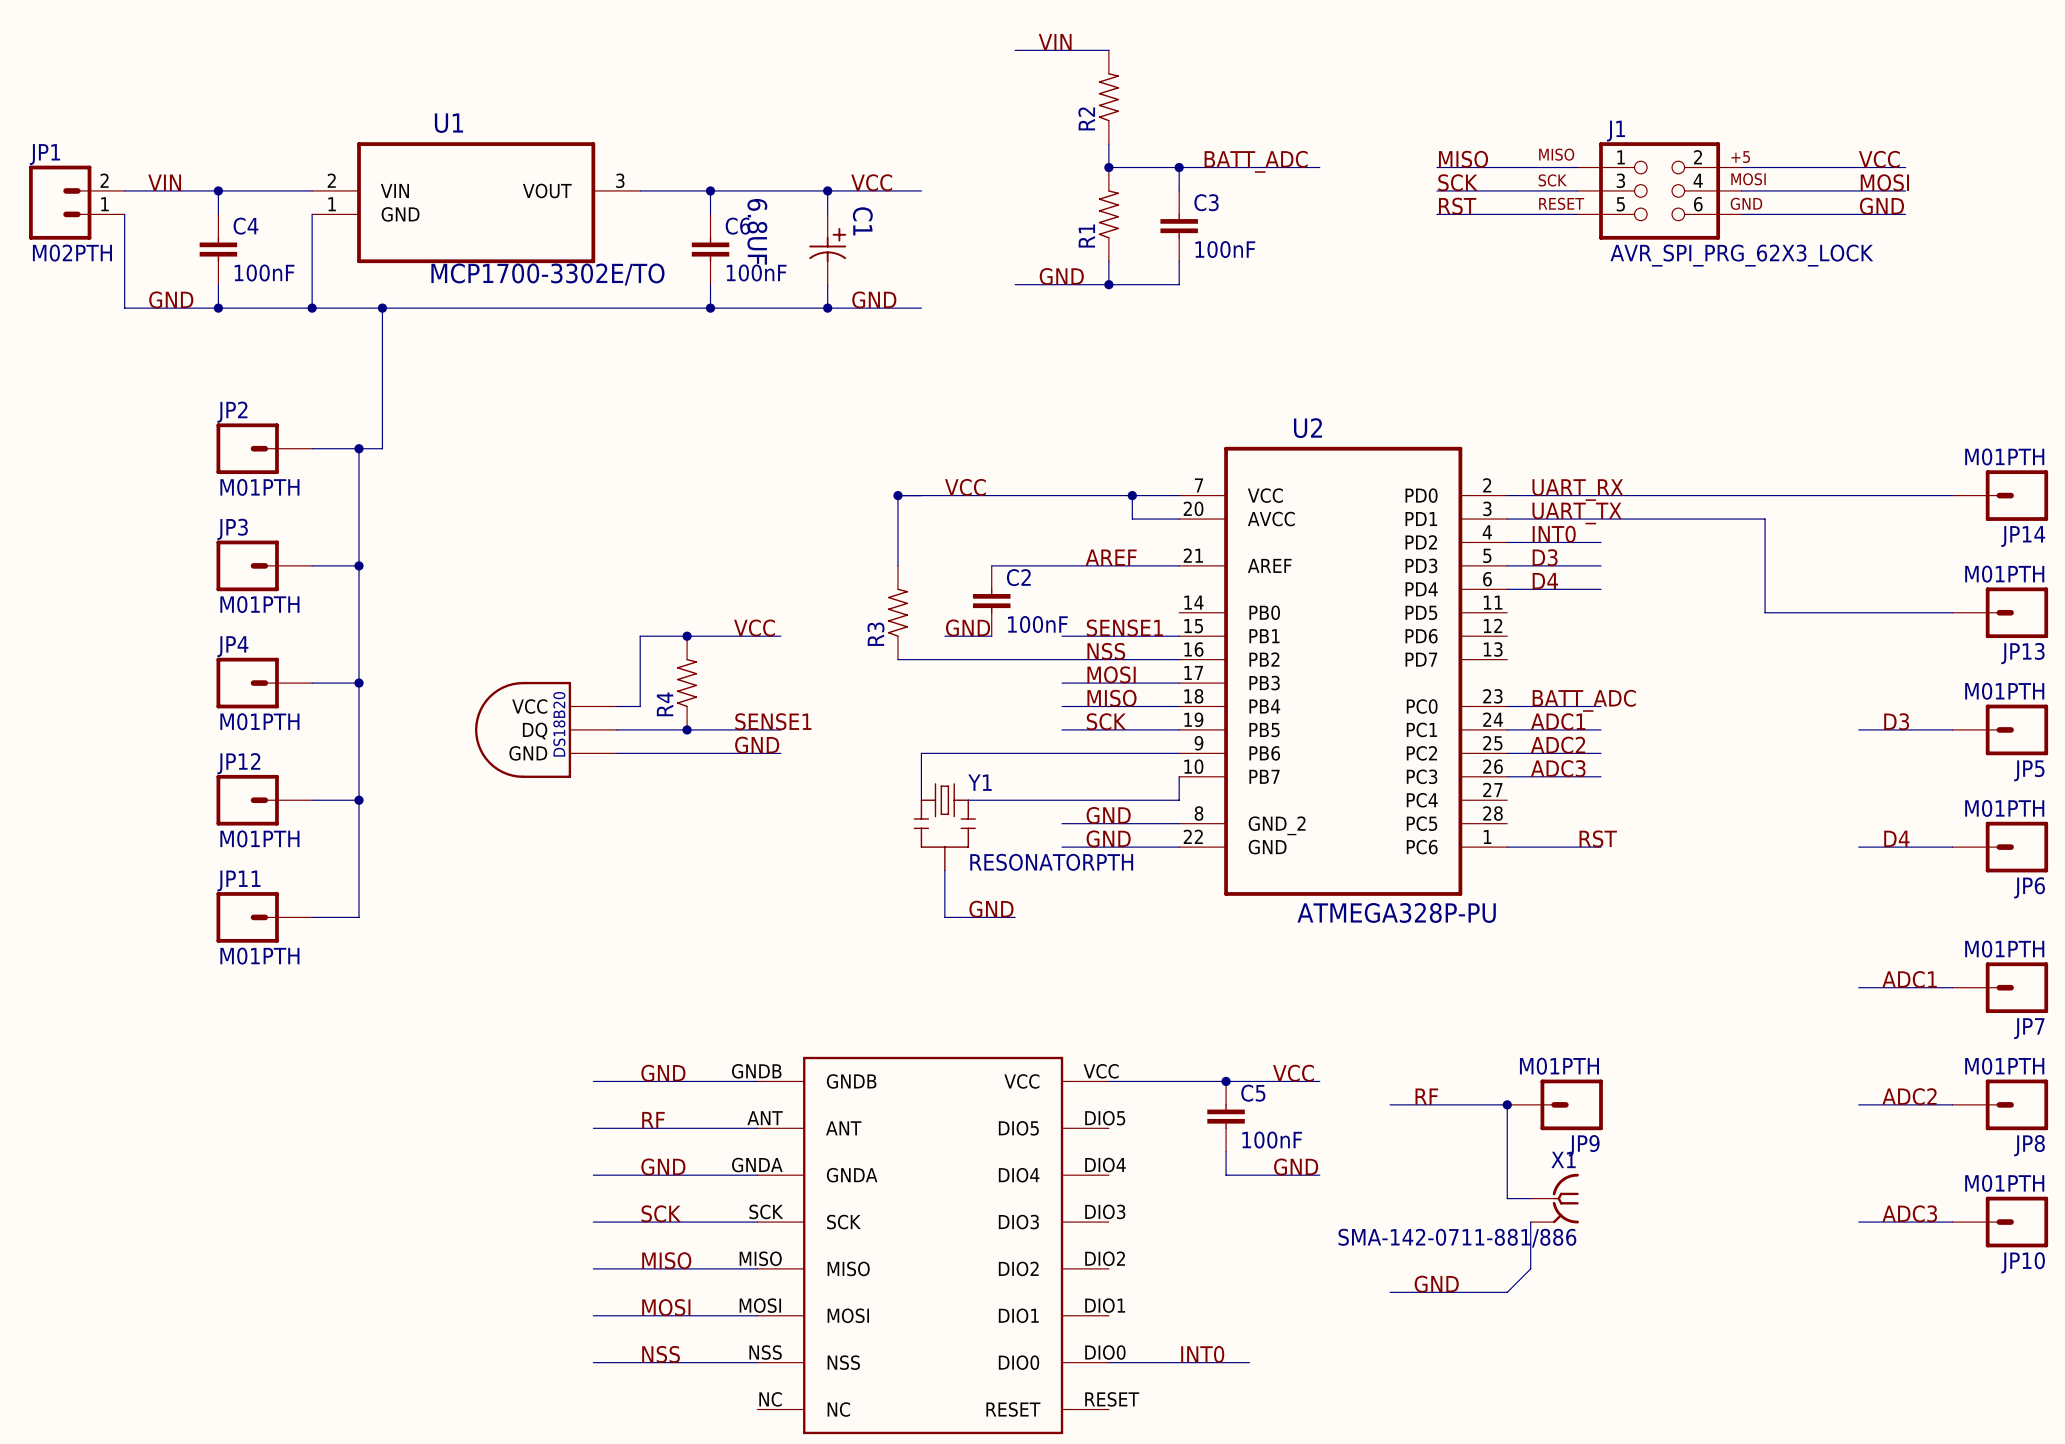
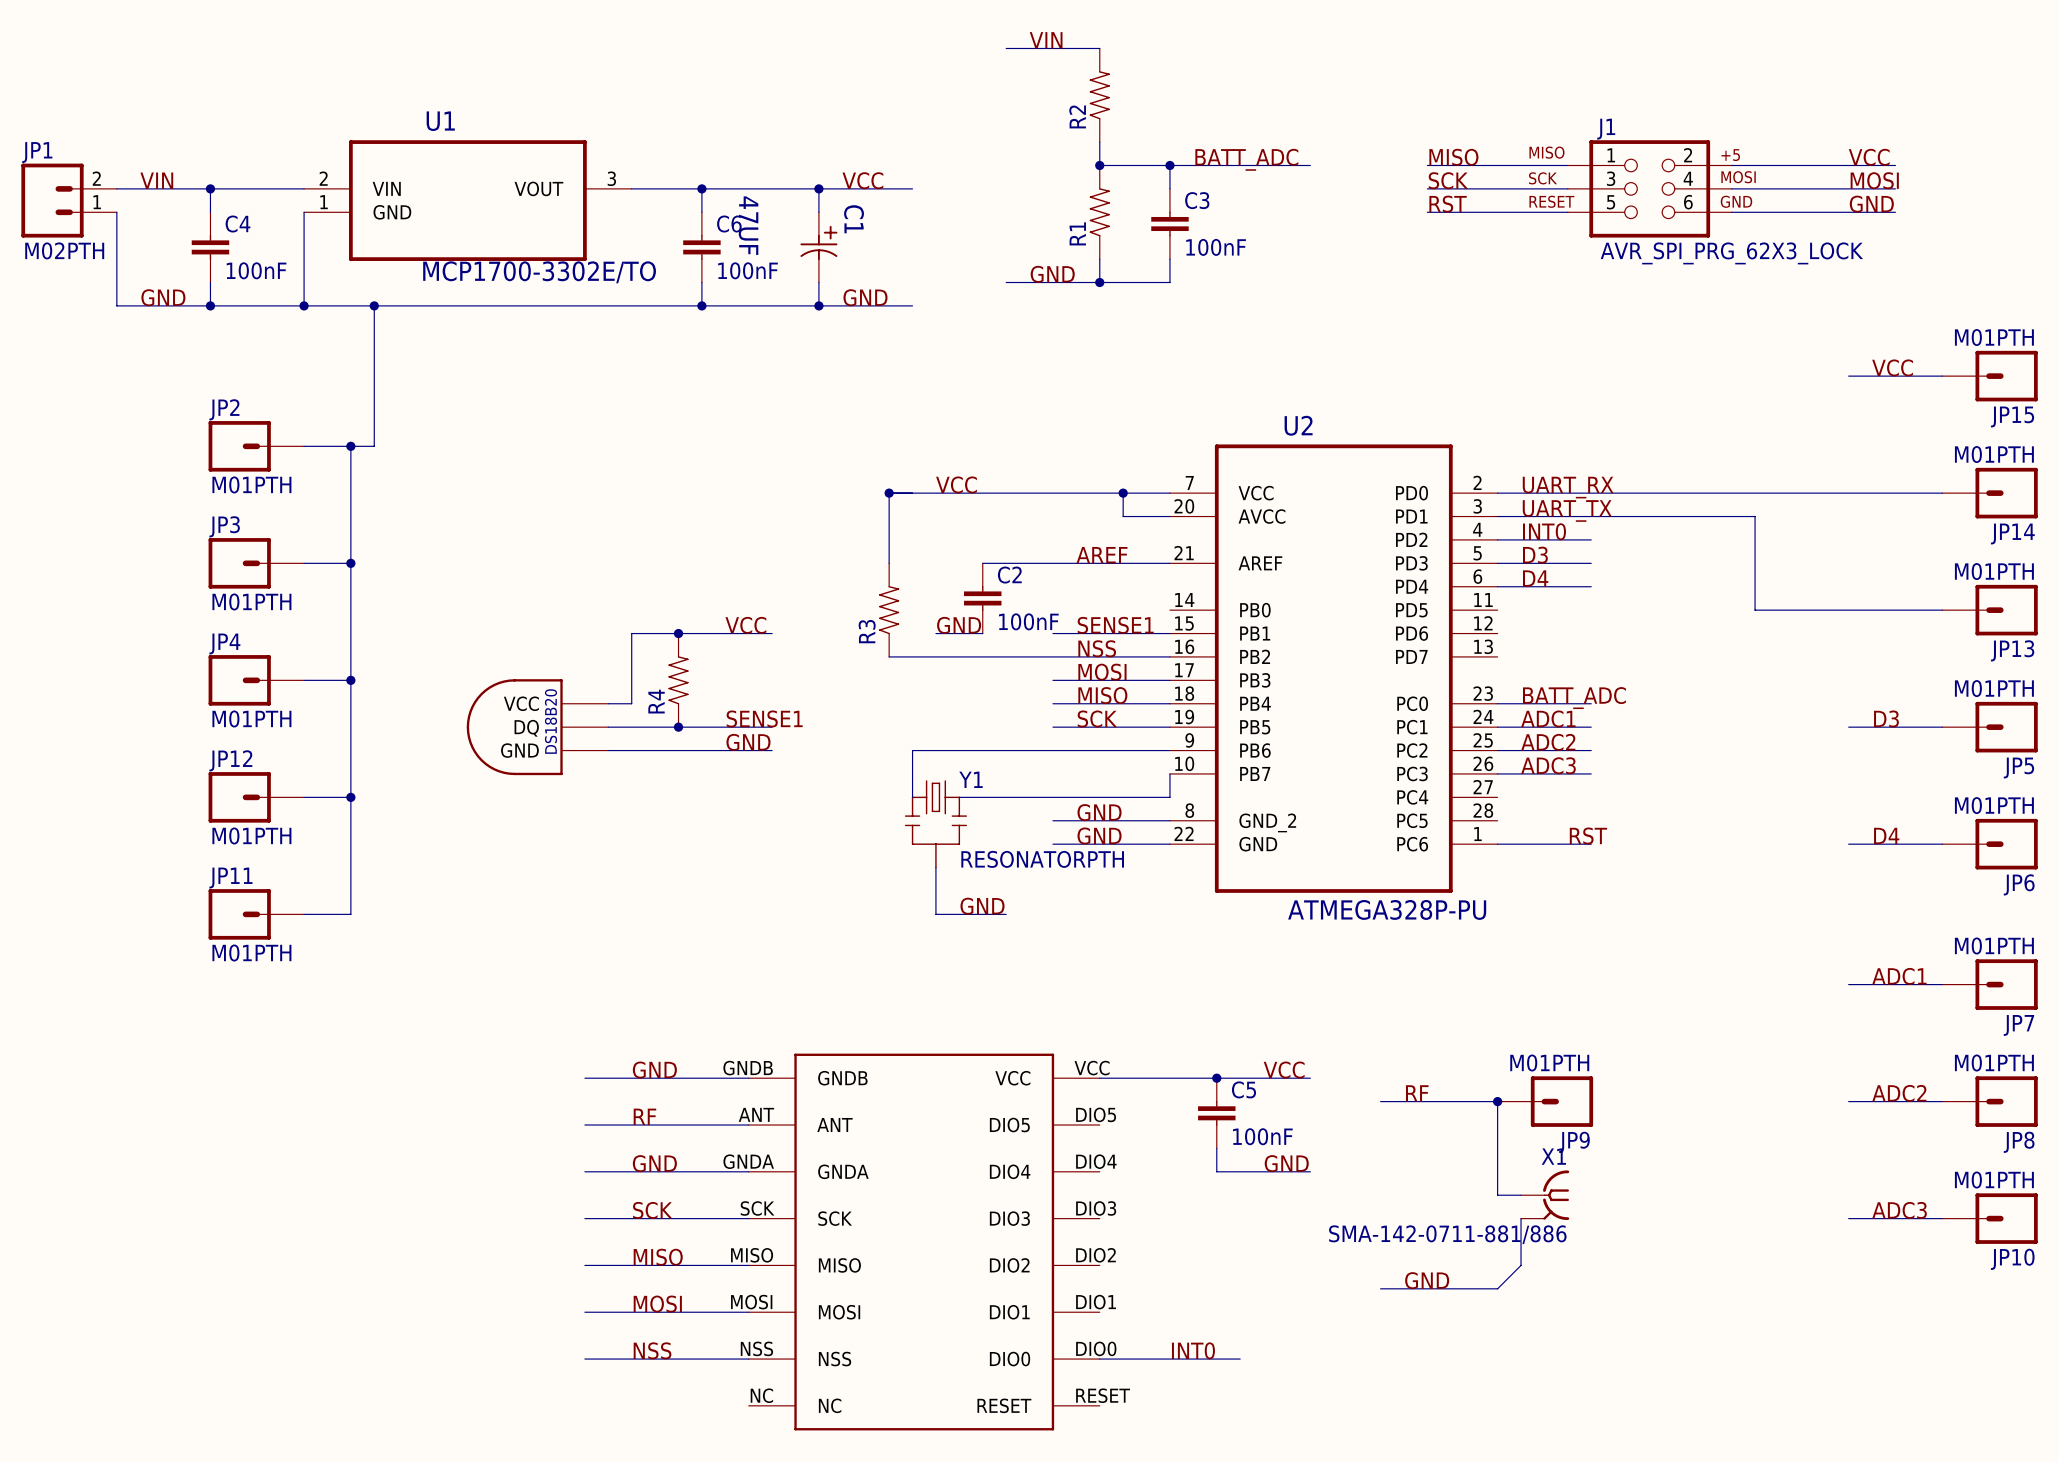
C1 value: 6.8UF (757, 231) -> 47UF (748, 225)
label: none -> VCC (1892, 367)
wire: none -> (1848, 376) (1942, 376)
JP15: none -> M01PTH (1990, 376)

